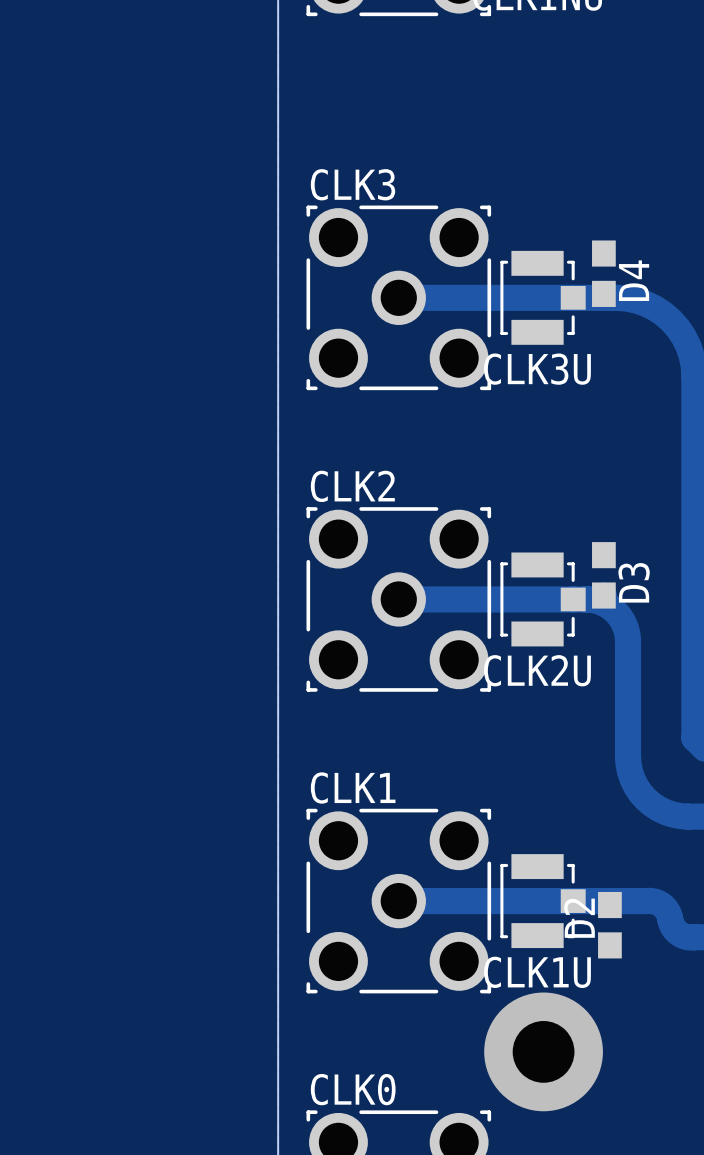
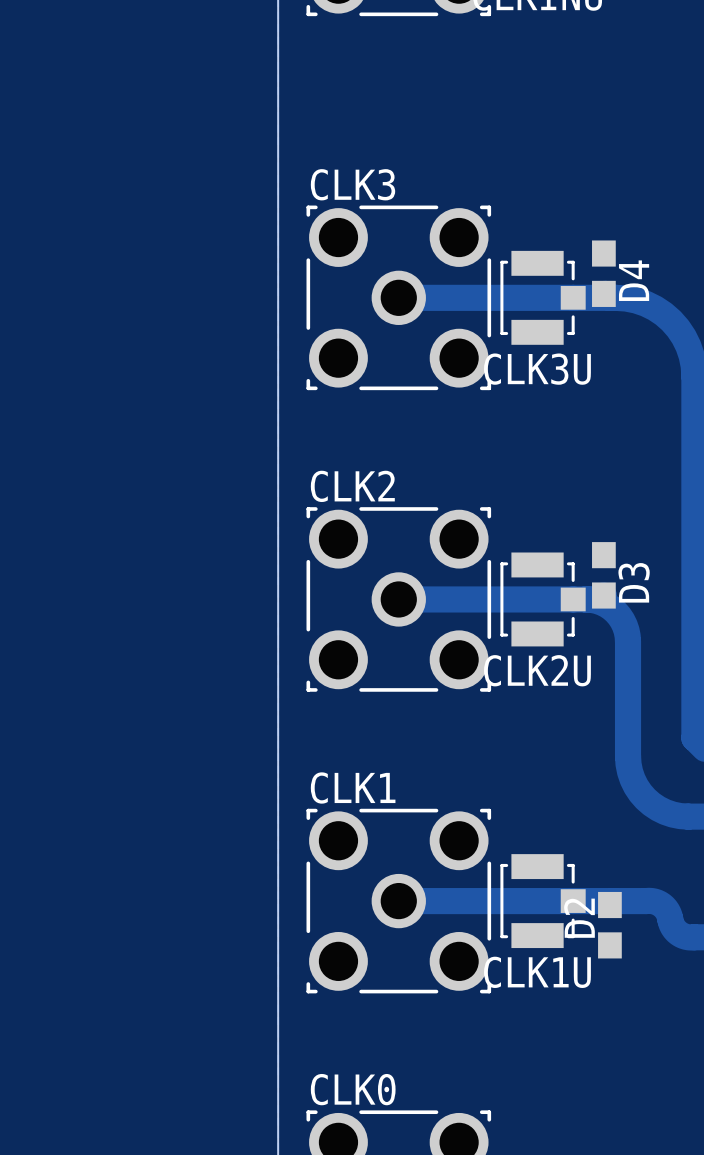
via: (543, 1051) -> none

